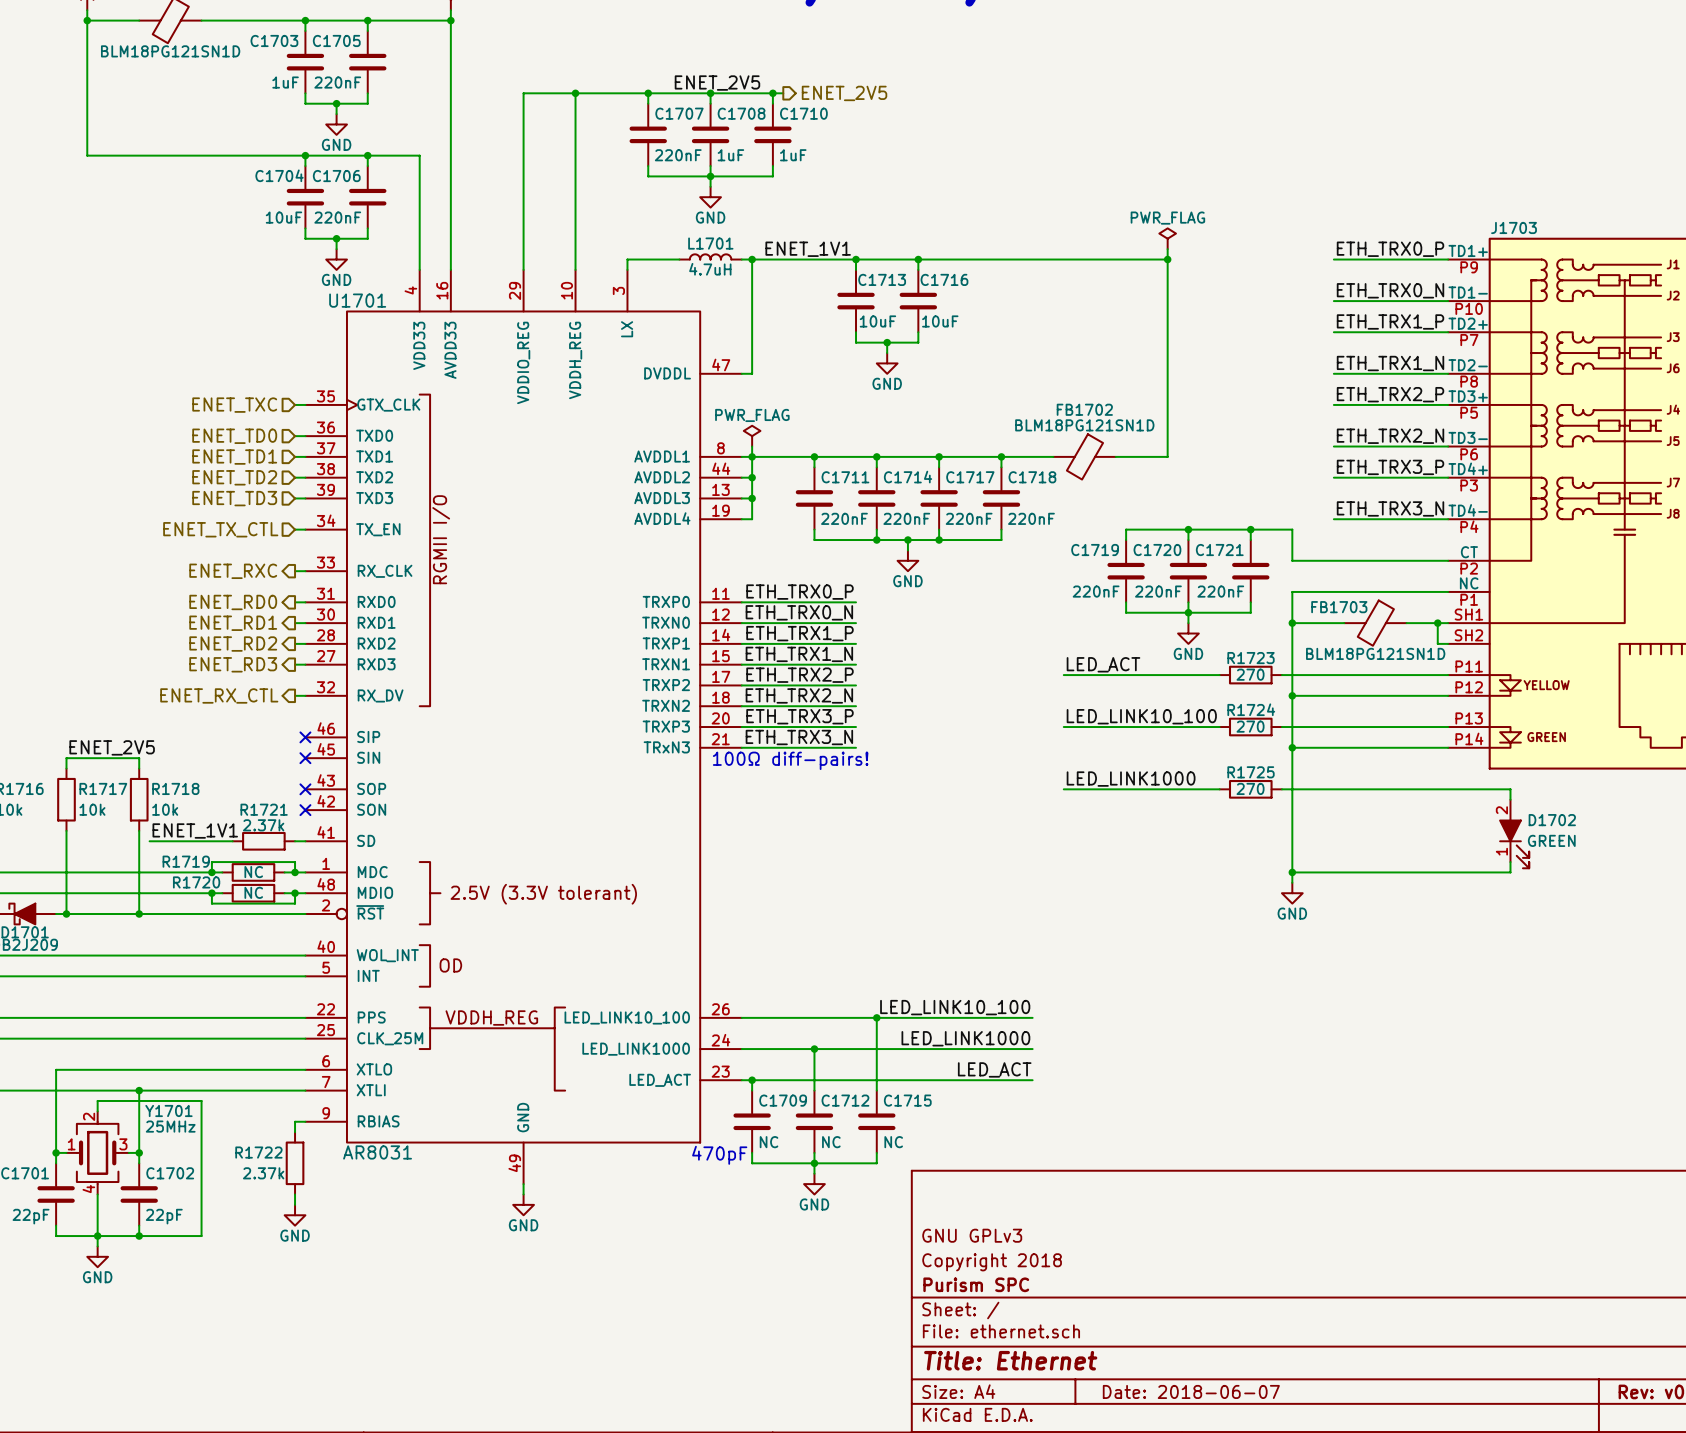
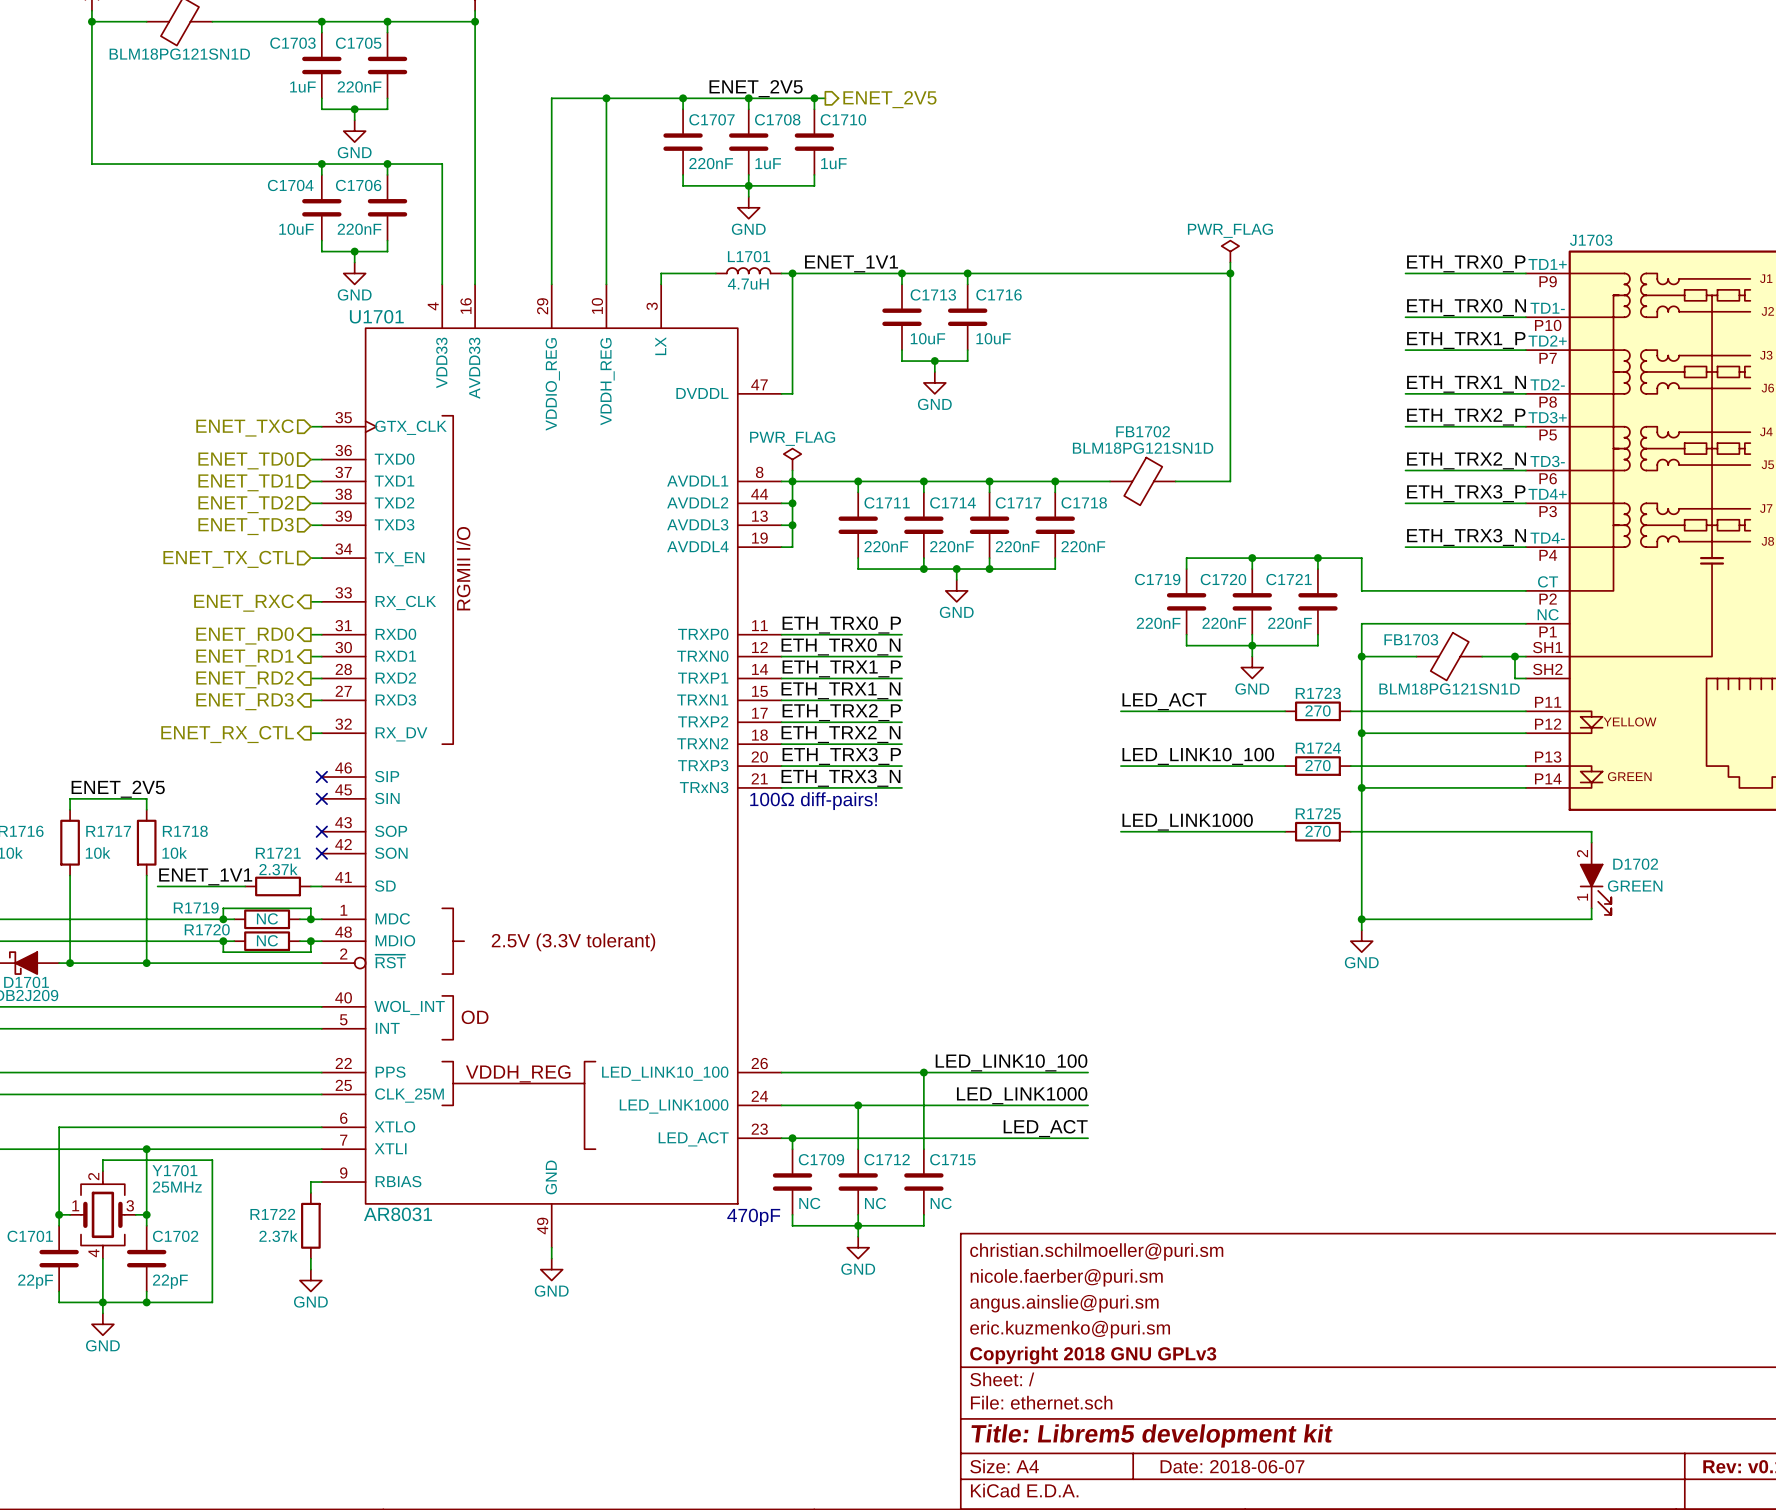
title block: none -> christian.schilmoeller@puri.sm (1096, 1251)
title block: none -> nicole.faerber@puri.sm (1066, 1277)
title block: GNU GPLv3 (972, 1235) -> angus.ainslie@puri.sm (1064, 1303)
title block: Copyright 2018 (992, 1262) -> eric.kuzmenko@puri.sm (1070, 1329)
title block: Purism SPC (976, 1284) -> Copyright 2018 GNU GPLv3 (1093, 1355)
title block: Title: Ethernet (1010, 1360) -> Title: Librem5 development kit (1152, 1435)

